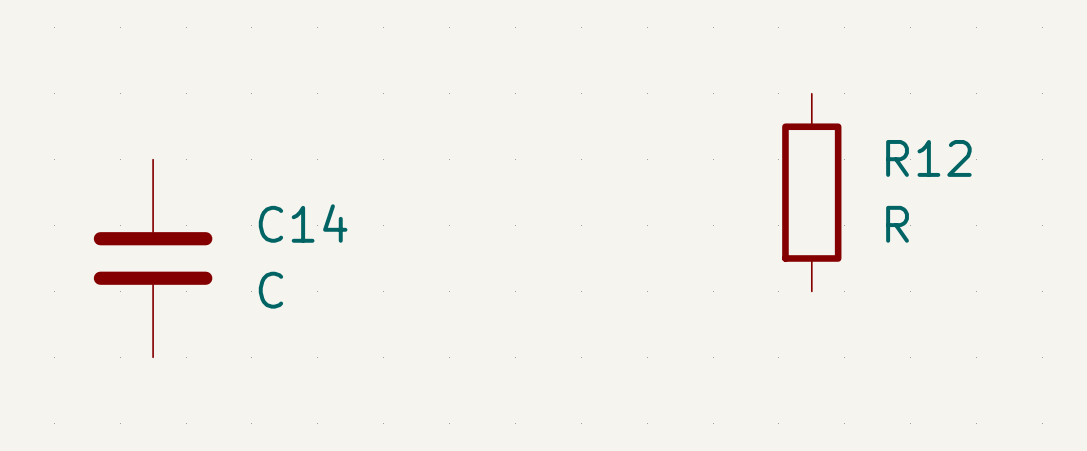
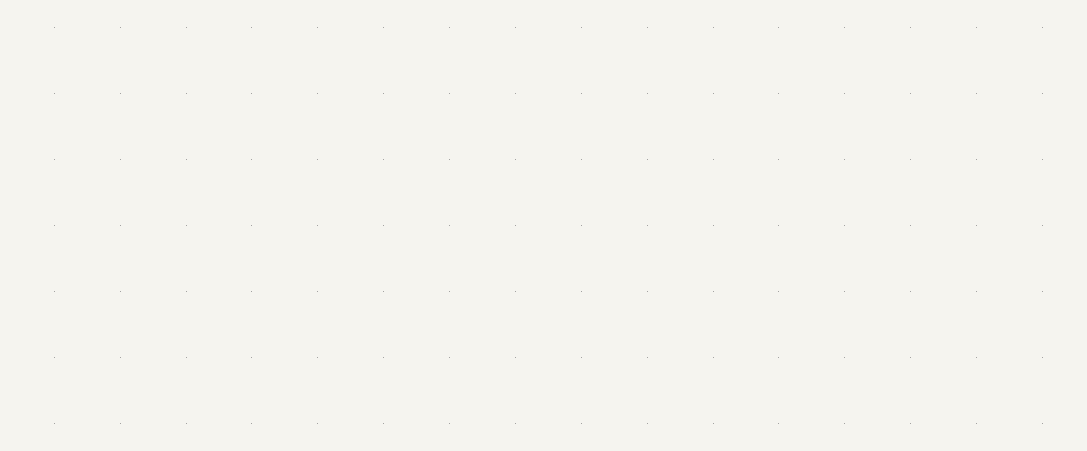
R12: R (811, 192) -> none
C14: C (153, 258) -> none

